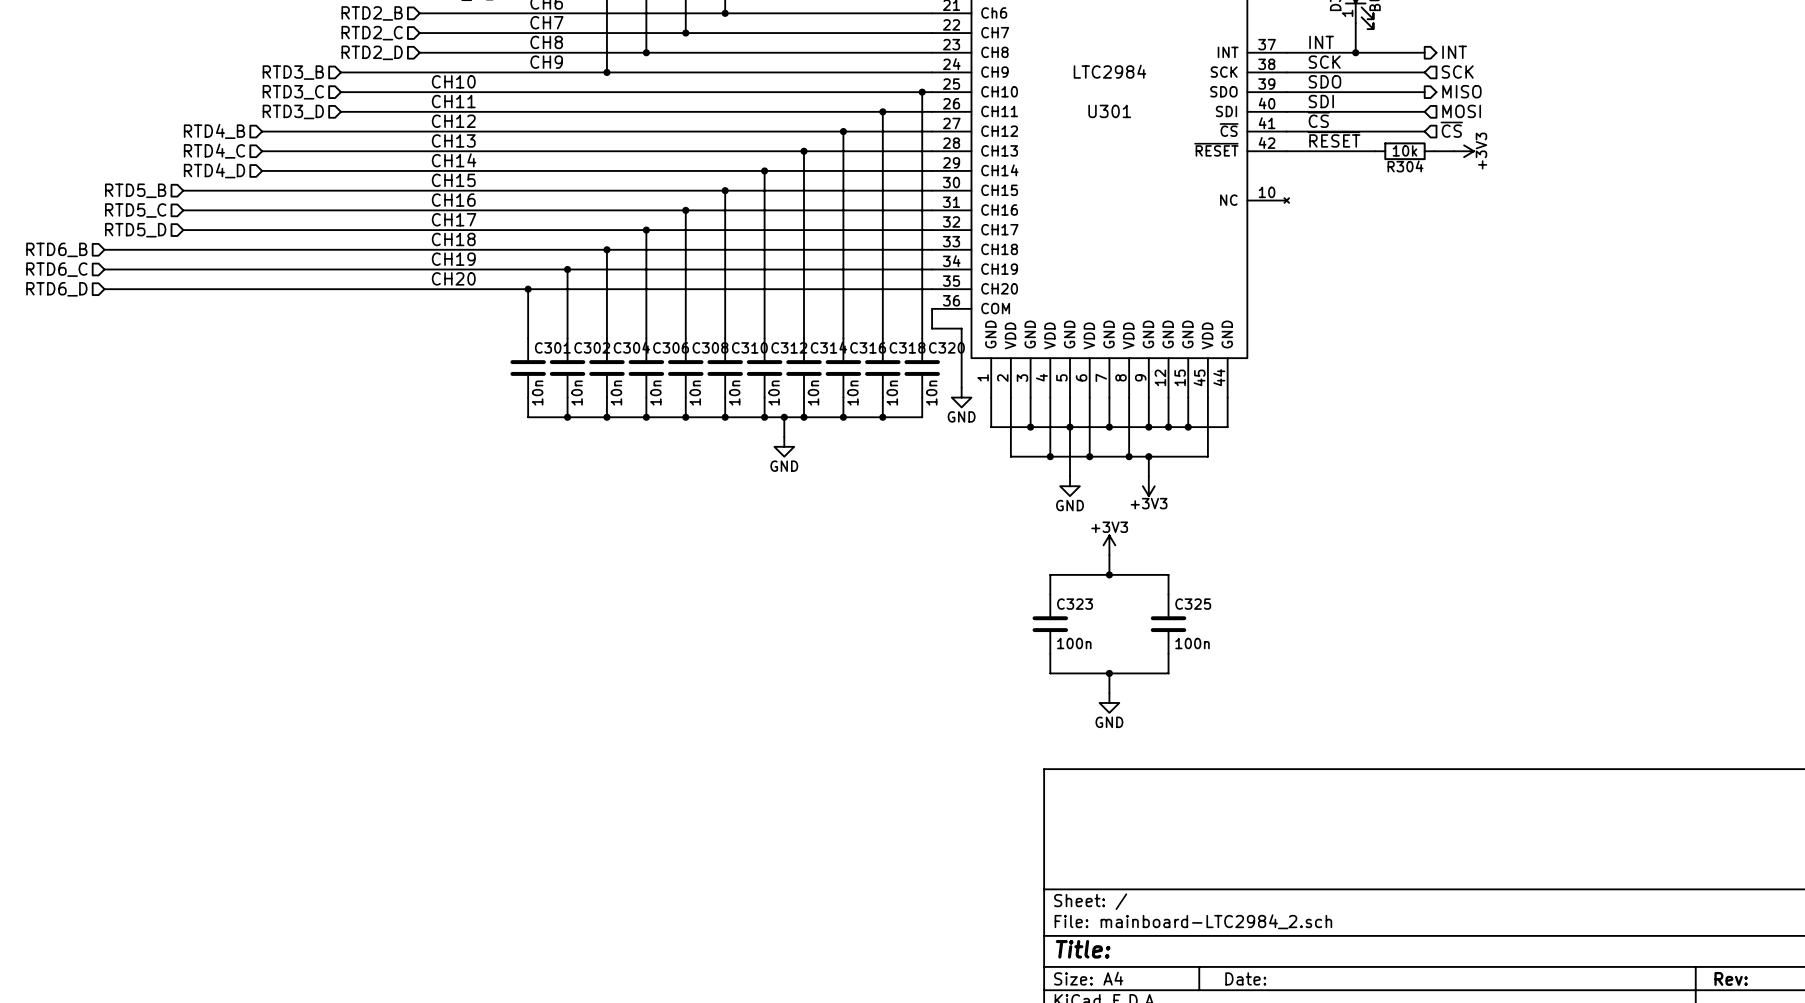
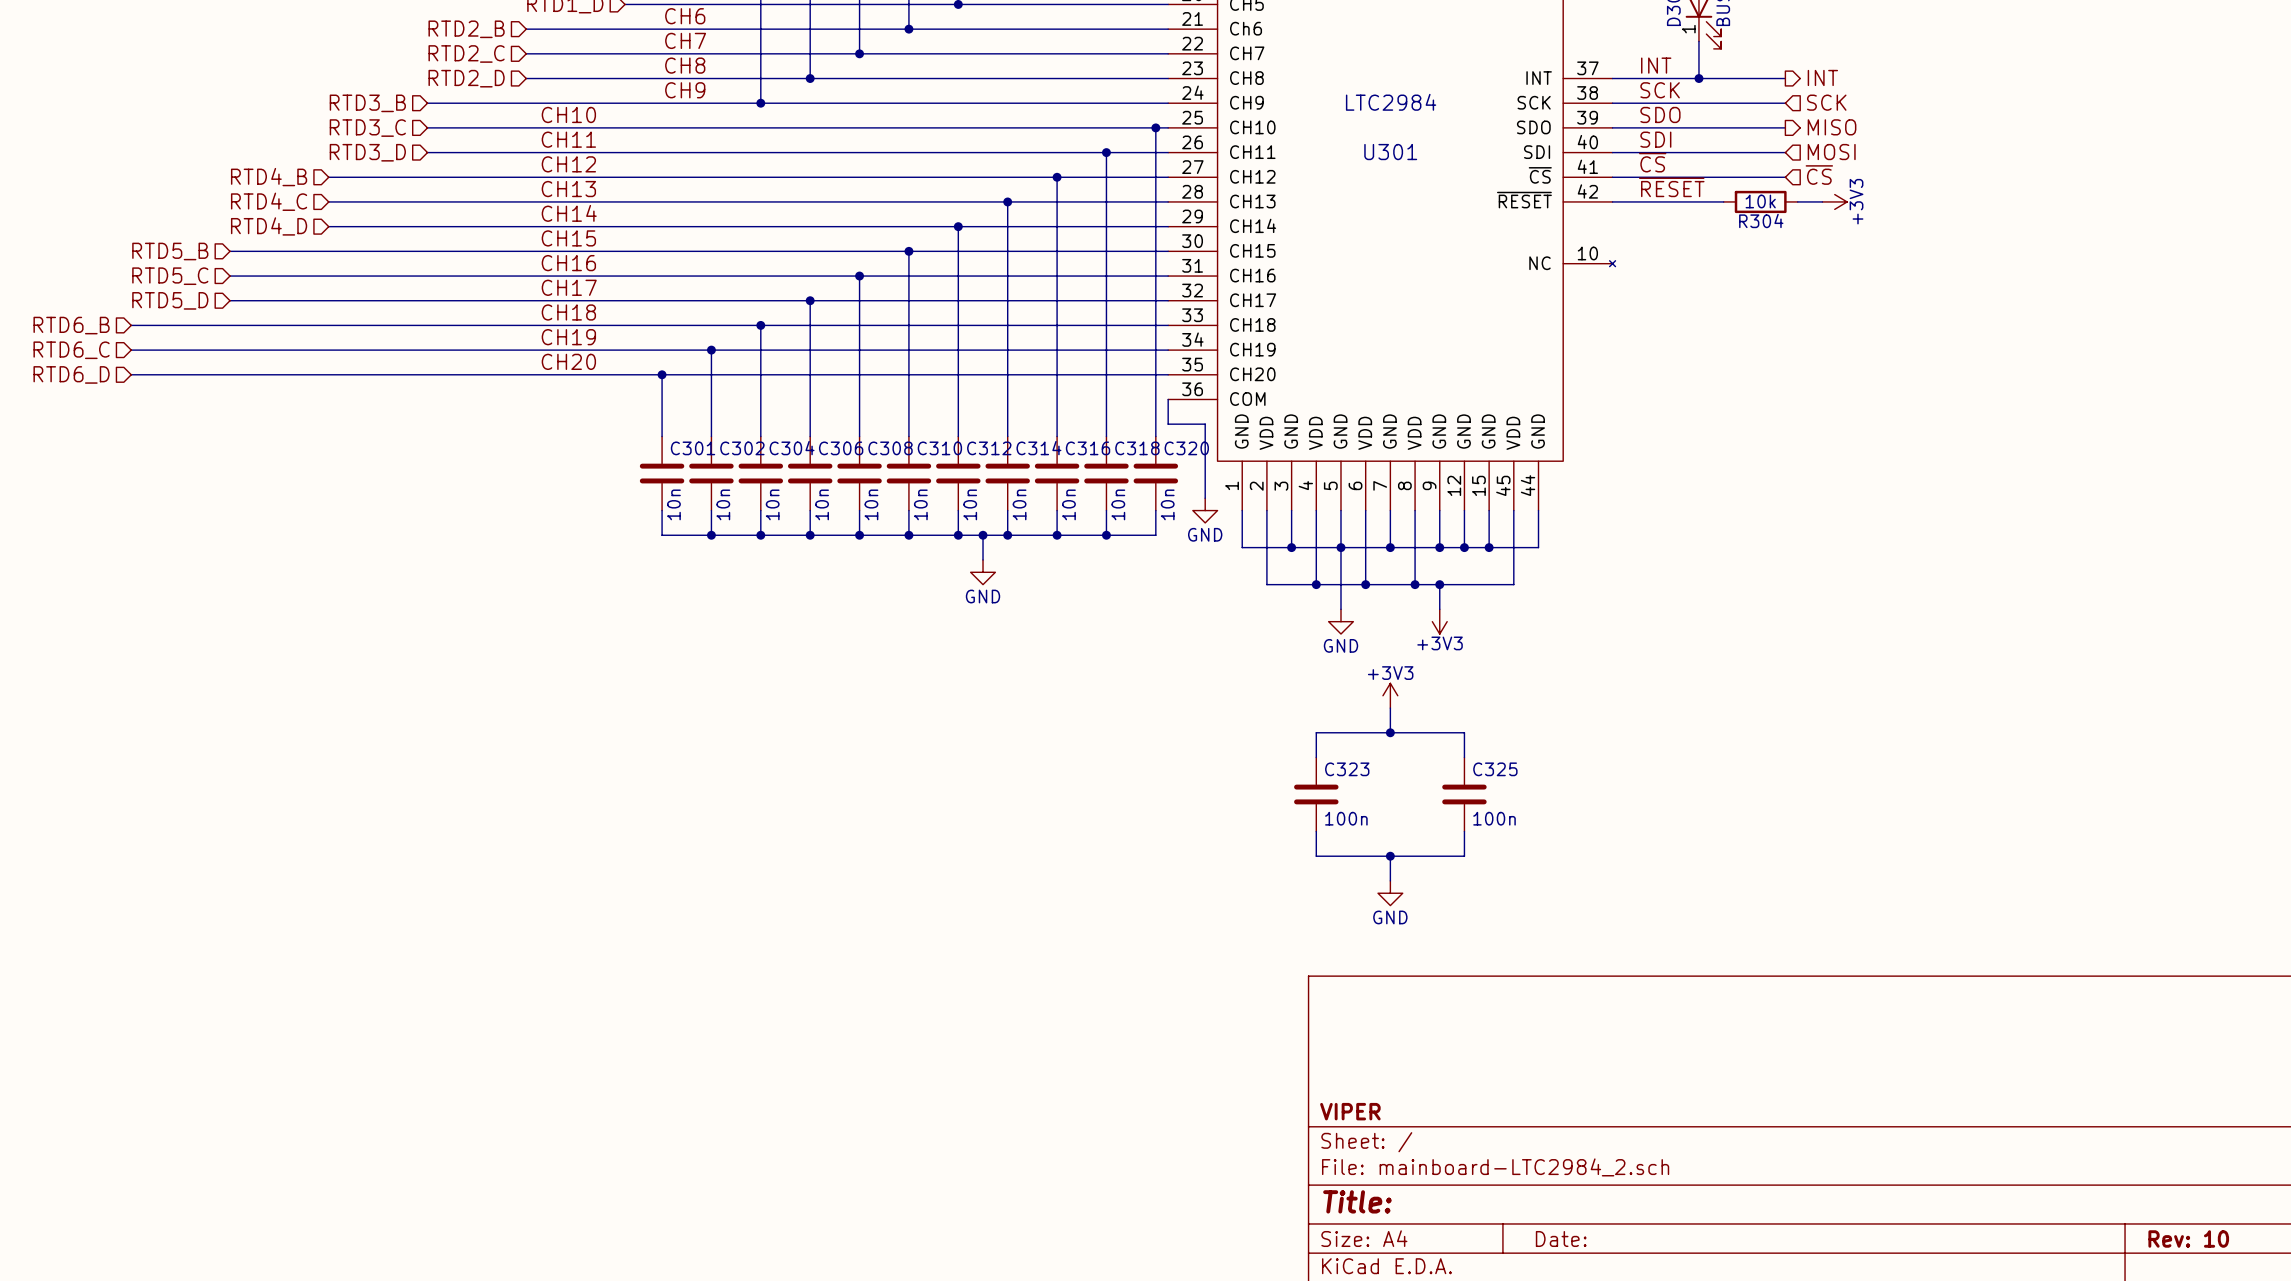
title block: none -> VIPER (1350, 1111)
title block: Rev: (1731, 978) -> Rev: 10 (2188, 1238)

